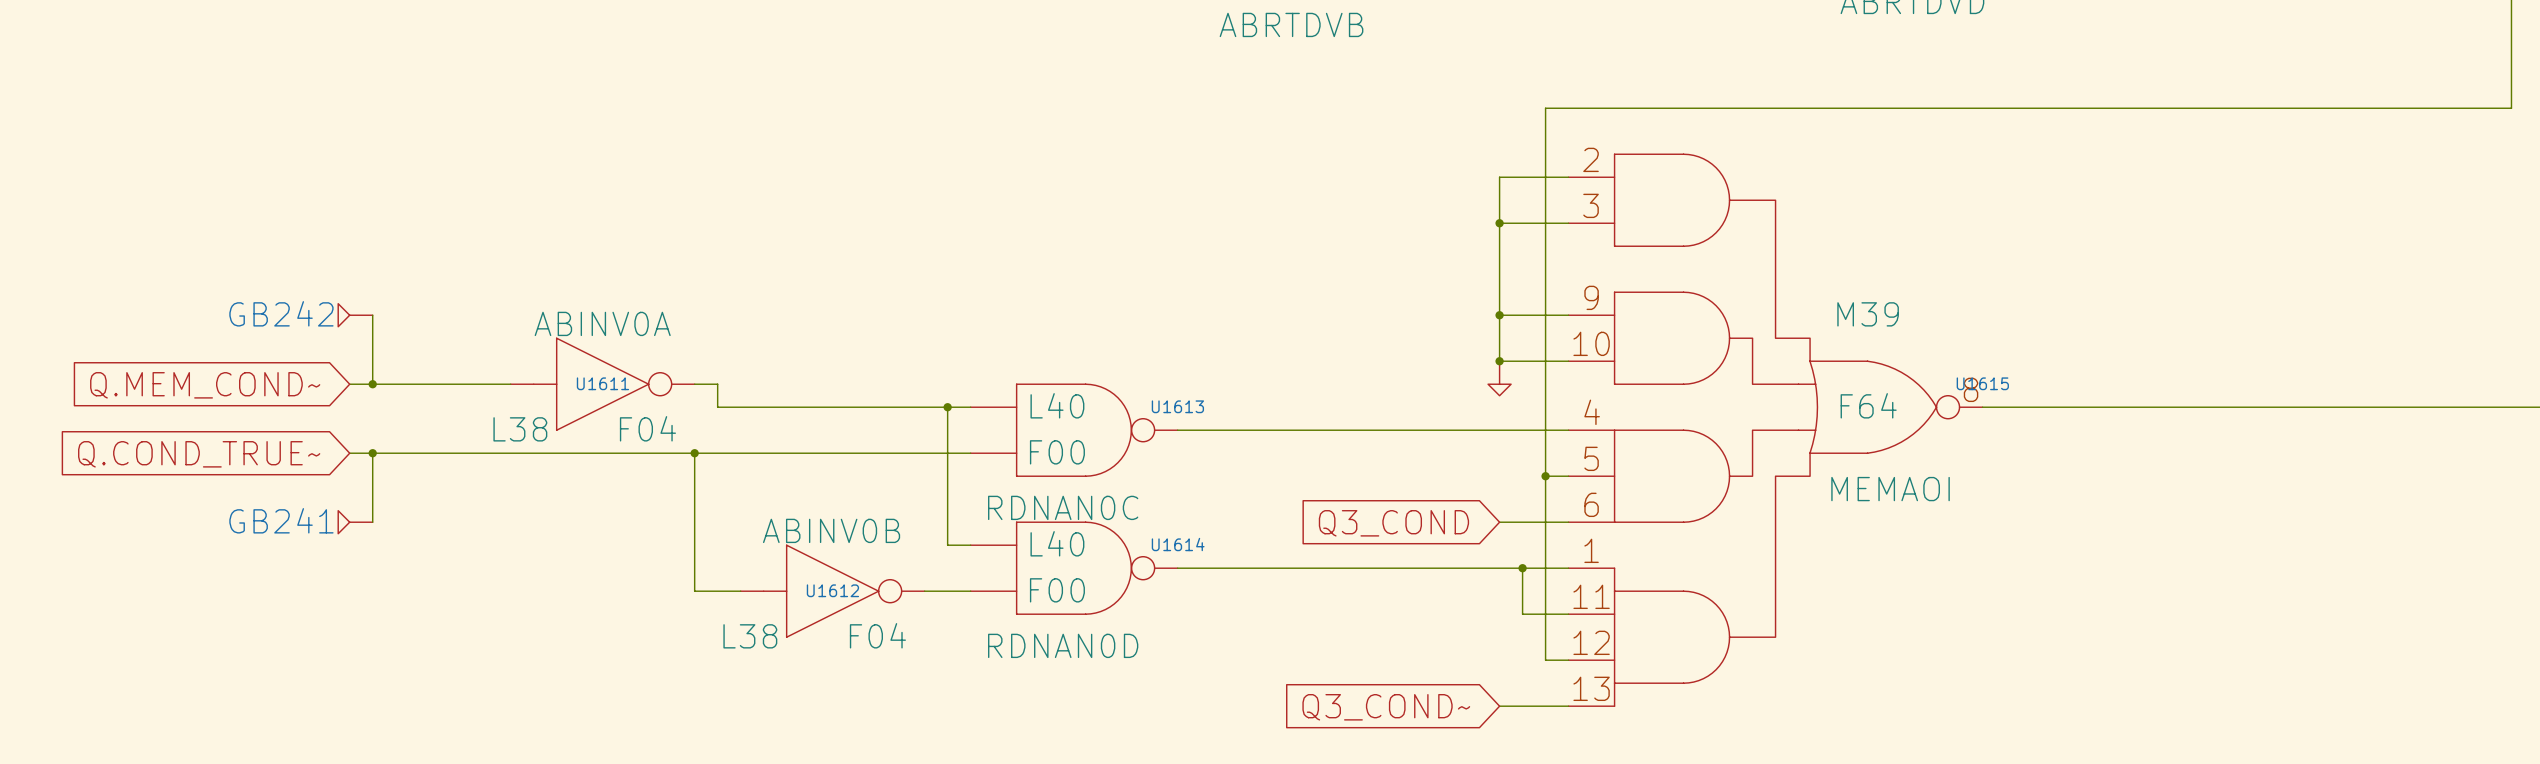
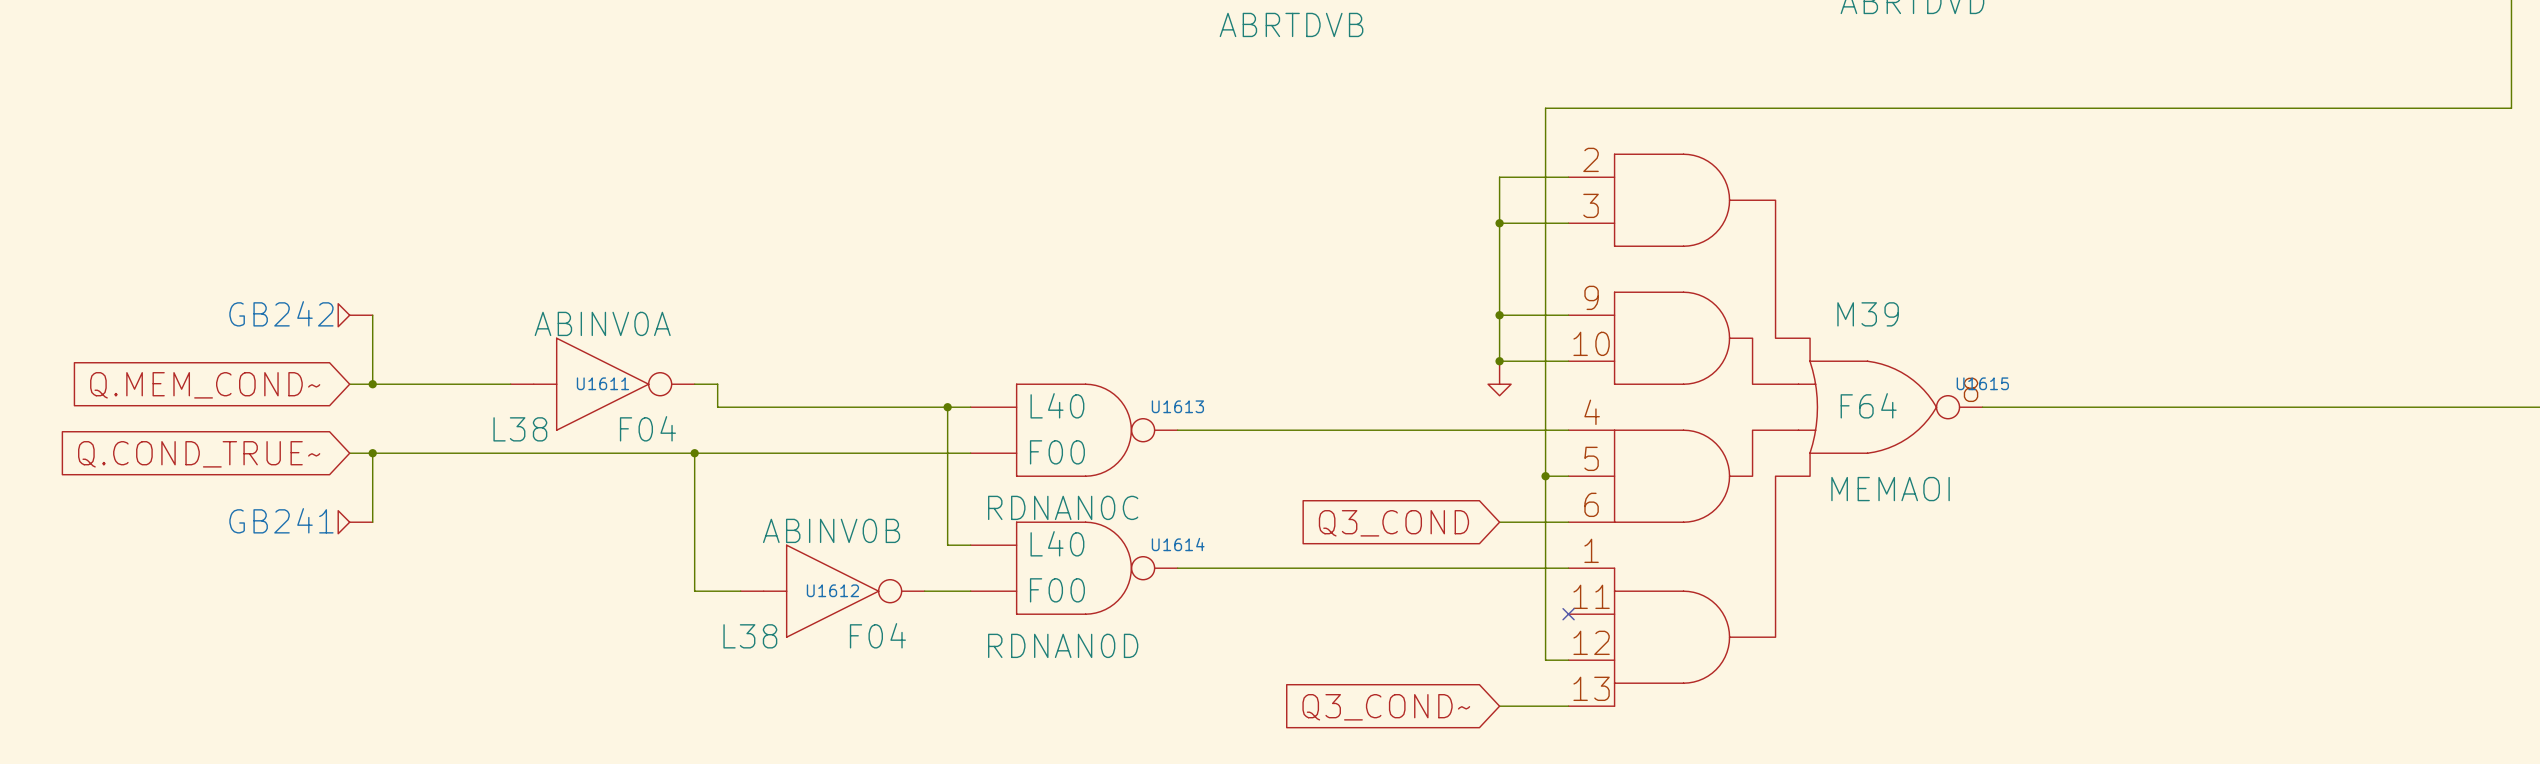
wire: (1522, 568) (1522, 614) (1568, 614) -> none
junction: (1522, 568) -> none
no-connect mark: none -> (1568, 614)

